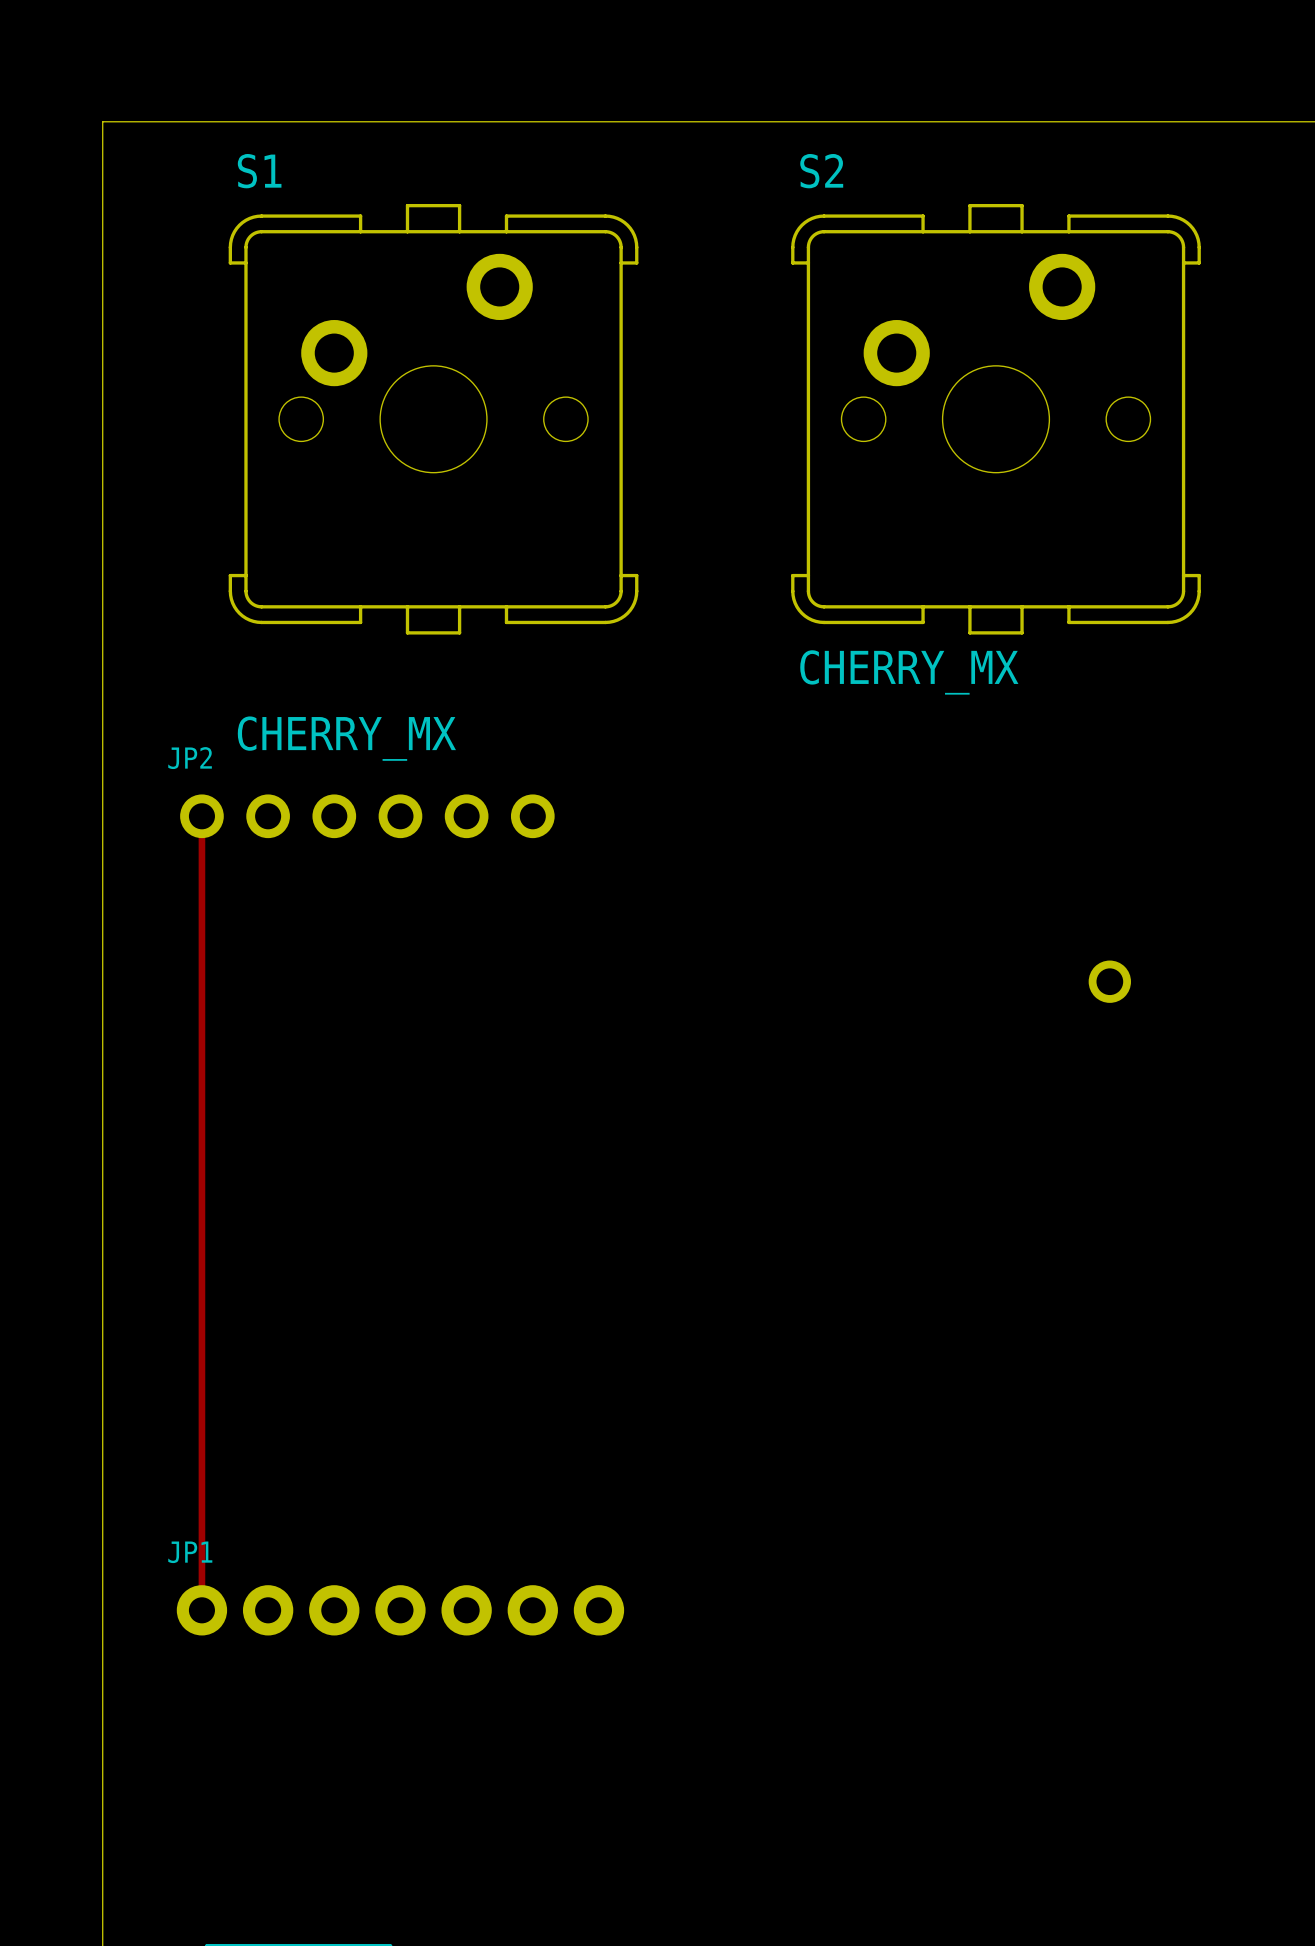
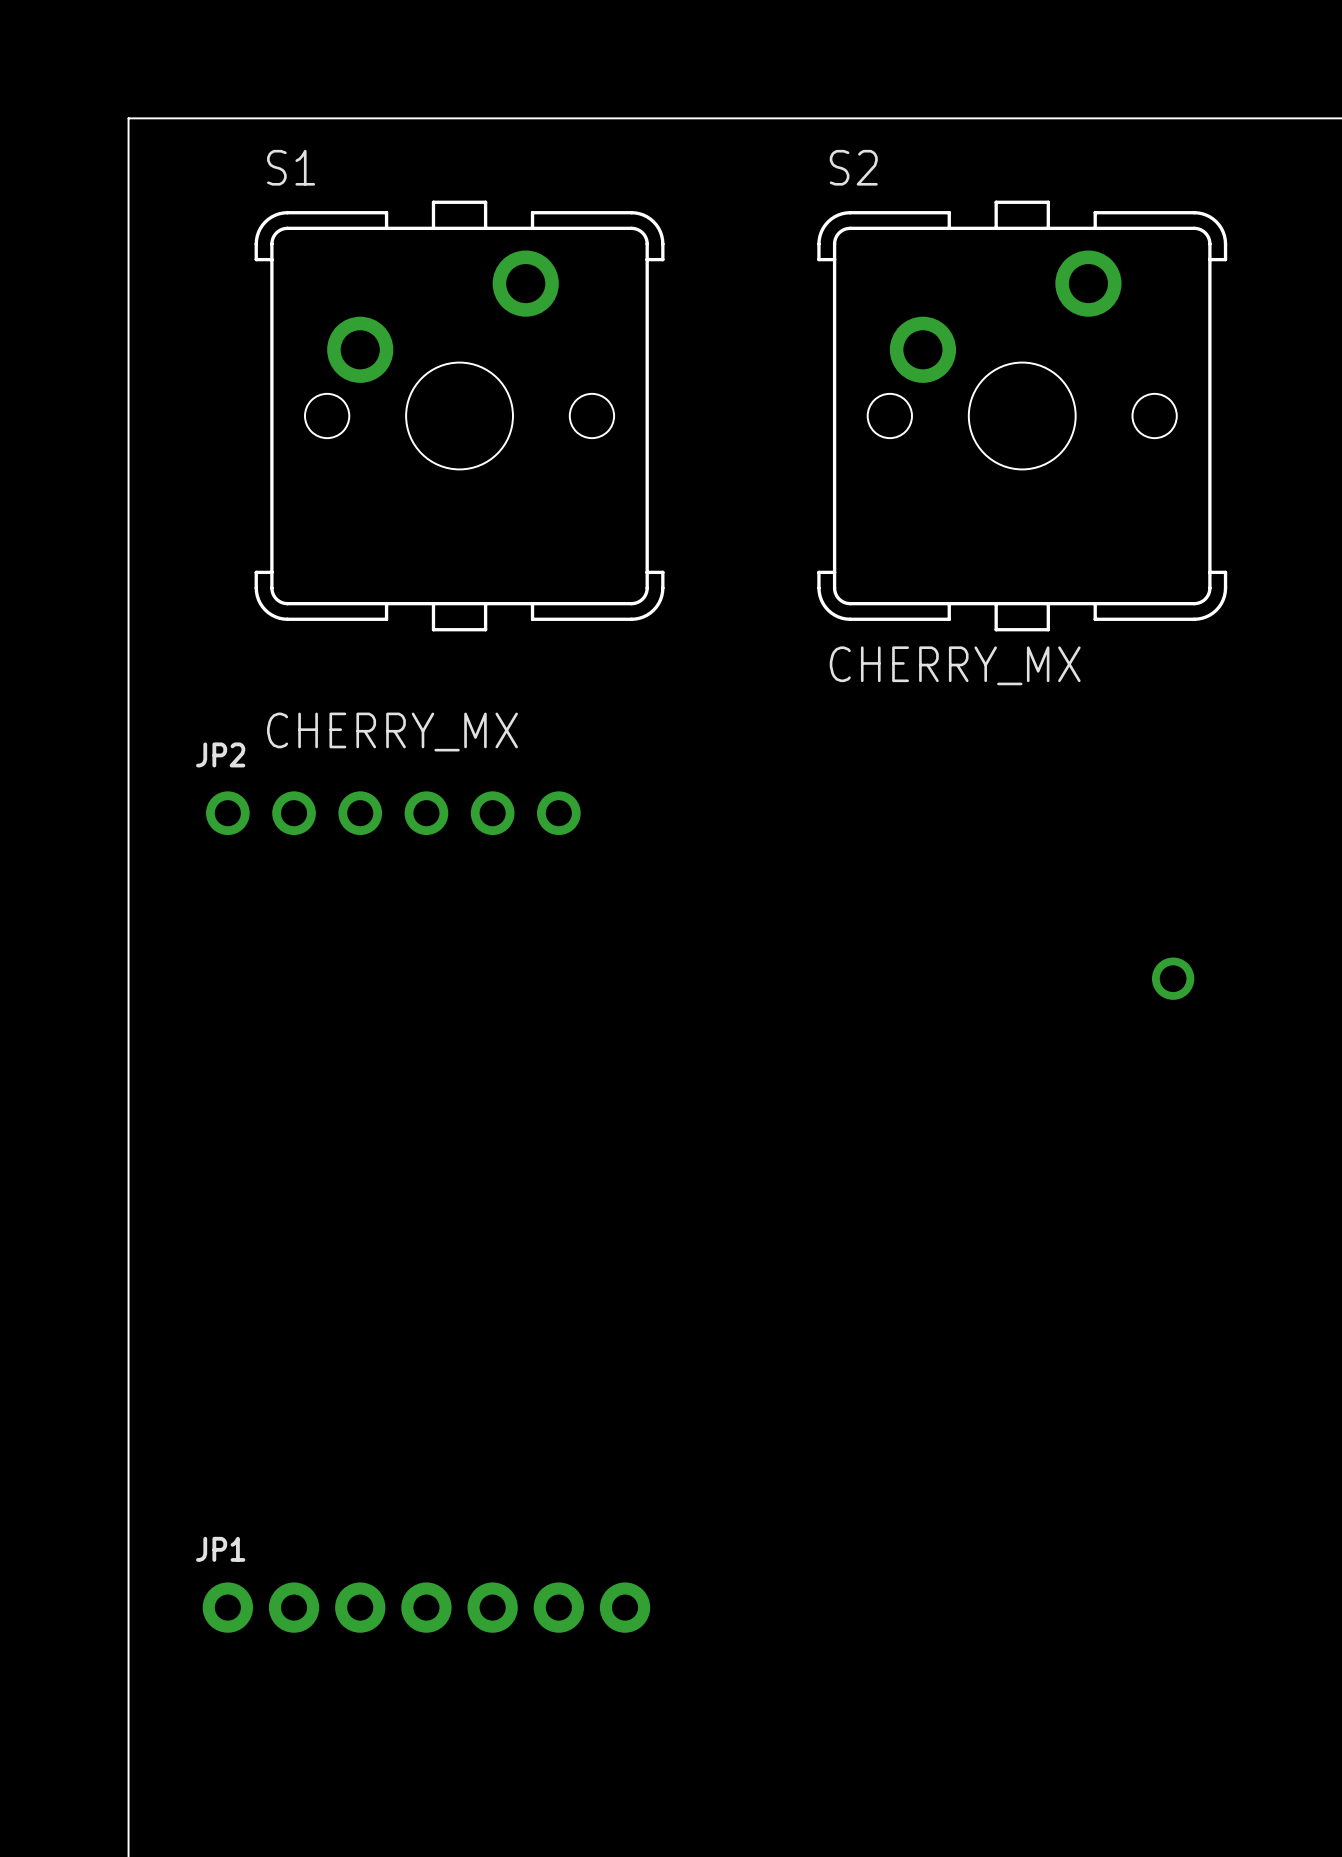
track: (201, 816) (201, 1610) -> none
part position: (1109, 981) -> (1173, 978)

